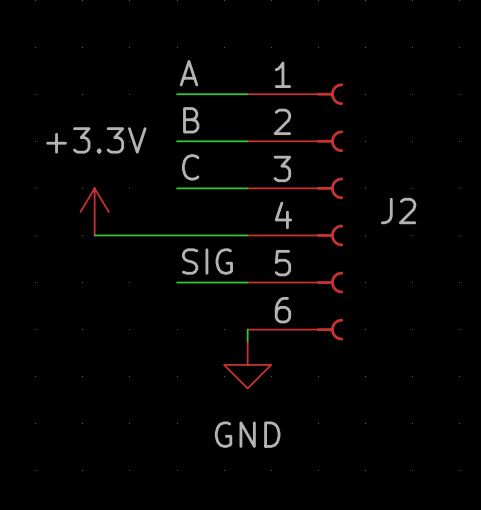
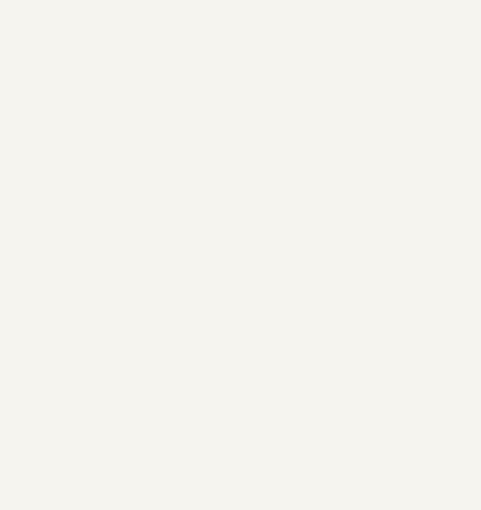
label: A (188, 73) -> none
wire: (177, 94) (247, 94) -> none
label: B (191, 120) -> none
wire: (177, 141) (247, 141) -> none
label: C (190, 167) -> none
wire: (177, 188) (247, 188) -> none
power symbol: +3.3V (94, 211) -> none
J2: (295, 211) -> none
wire: (94, 235) (247, 235) -> none
label: SIG (207, 261) -> none
wire: (177, 282) (247, 282) -> none
wire: (247, 329) (247, 341) -> none
power symbol: GND (247, 364) -> none

